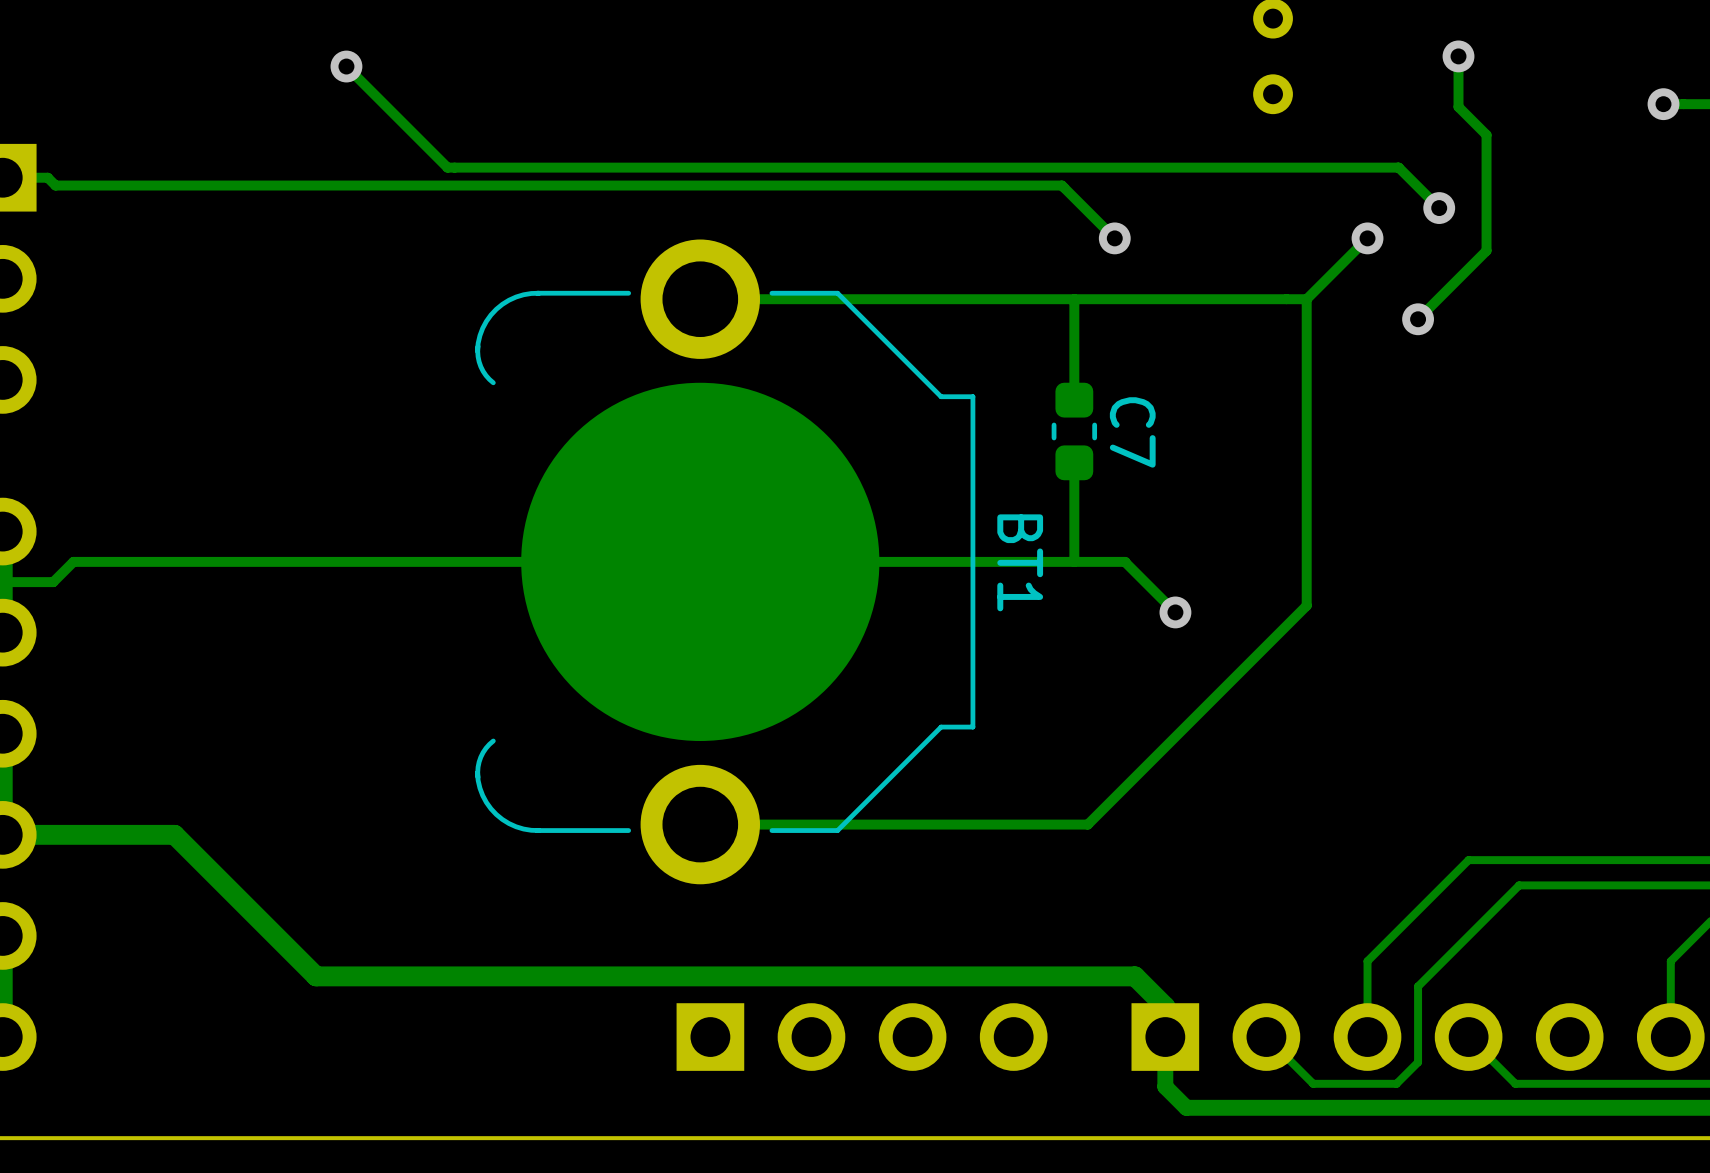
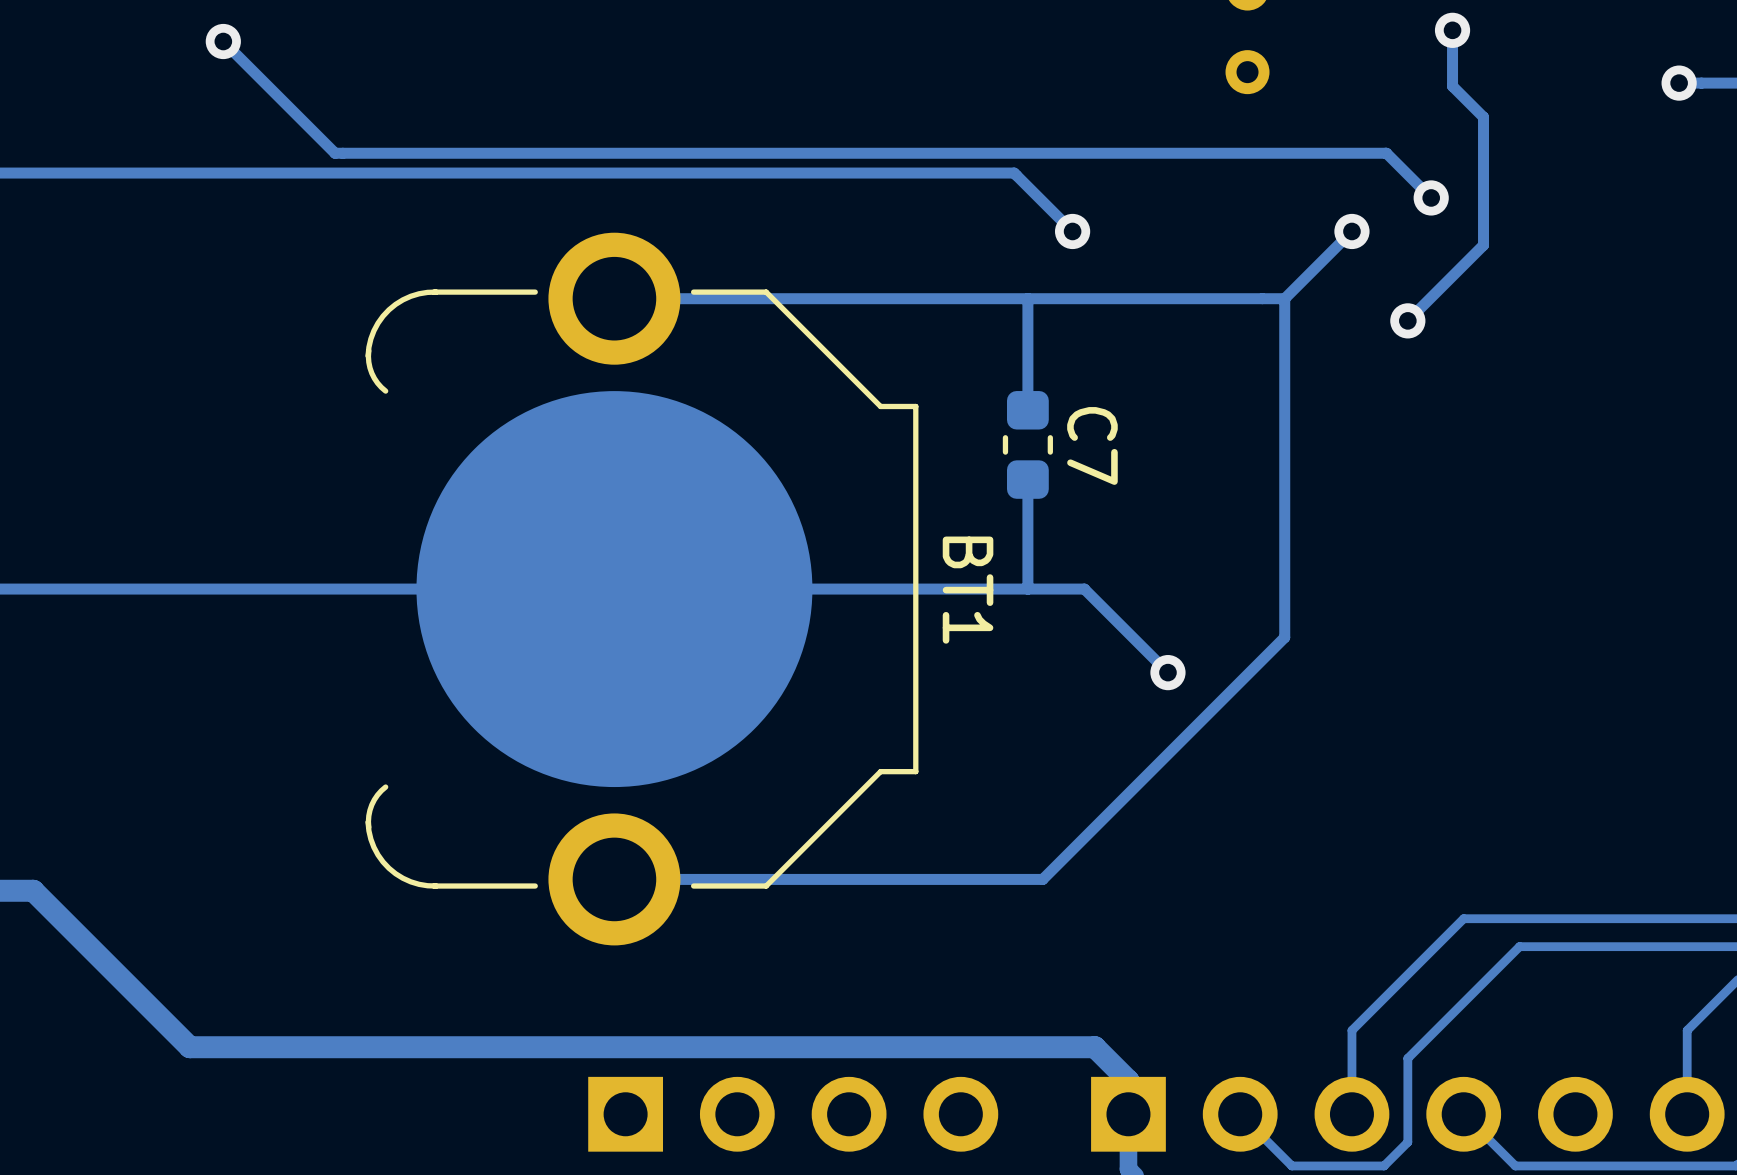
track: (1125, 562) (1175, 612) -> (1084, 589) (1167, 672)
via position: (1175, 612) -> (1167, 672)

